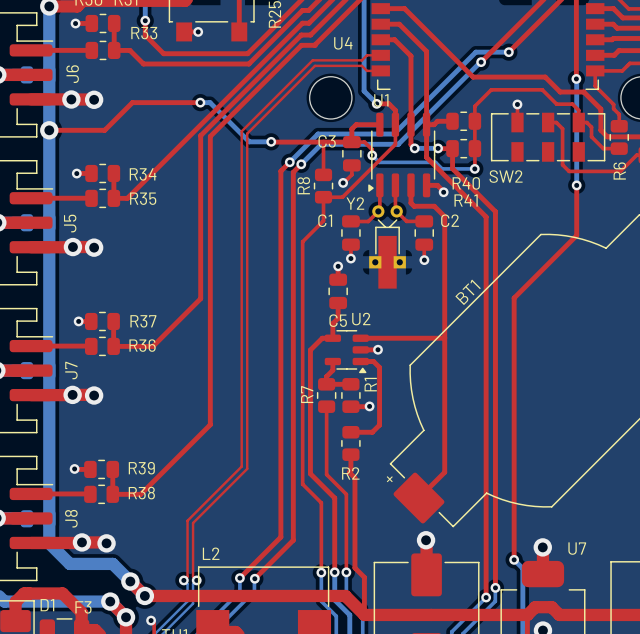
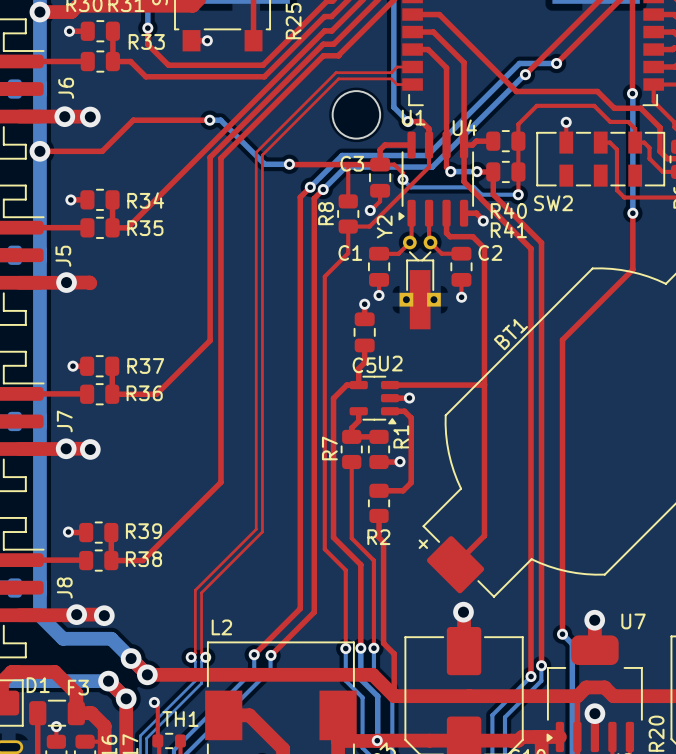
U4 name position: U4 (343, 43) -> U4 (464, 127)
Y2 name rotation: 0° (355, 203) -> 90° counterclockwise (384, 226)
via: (94, 247) -> none

